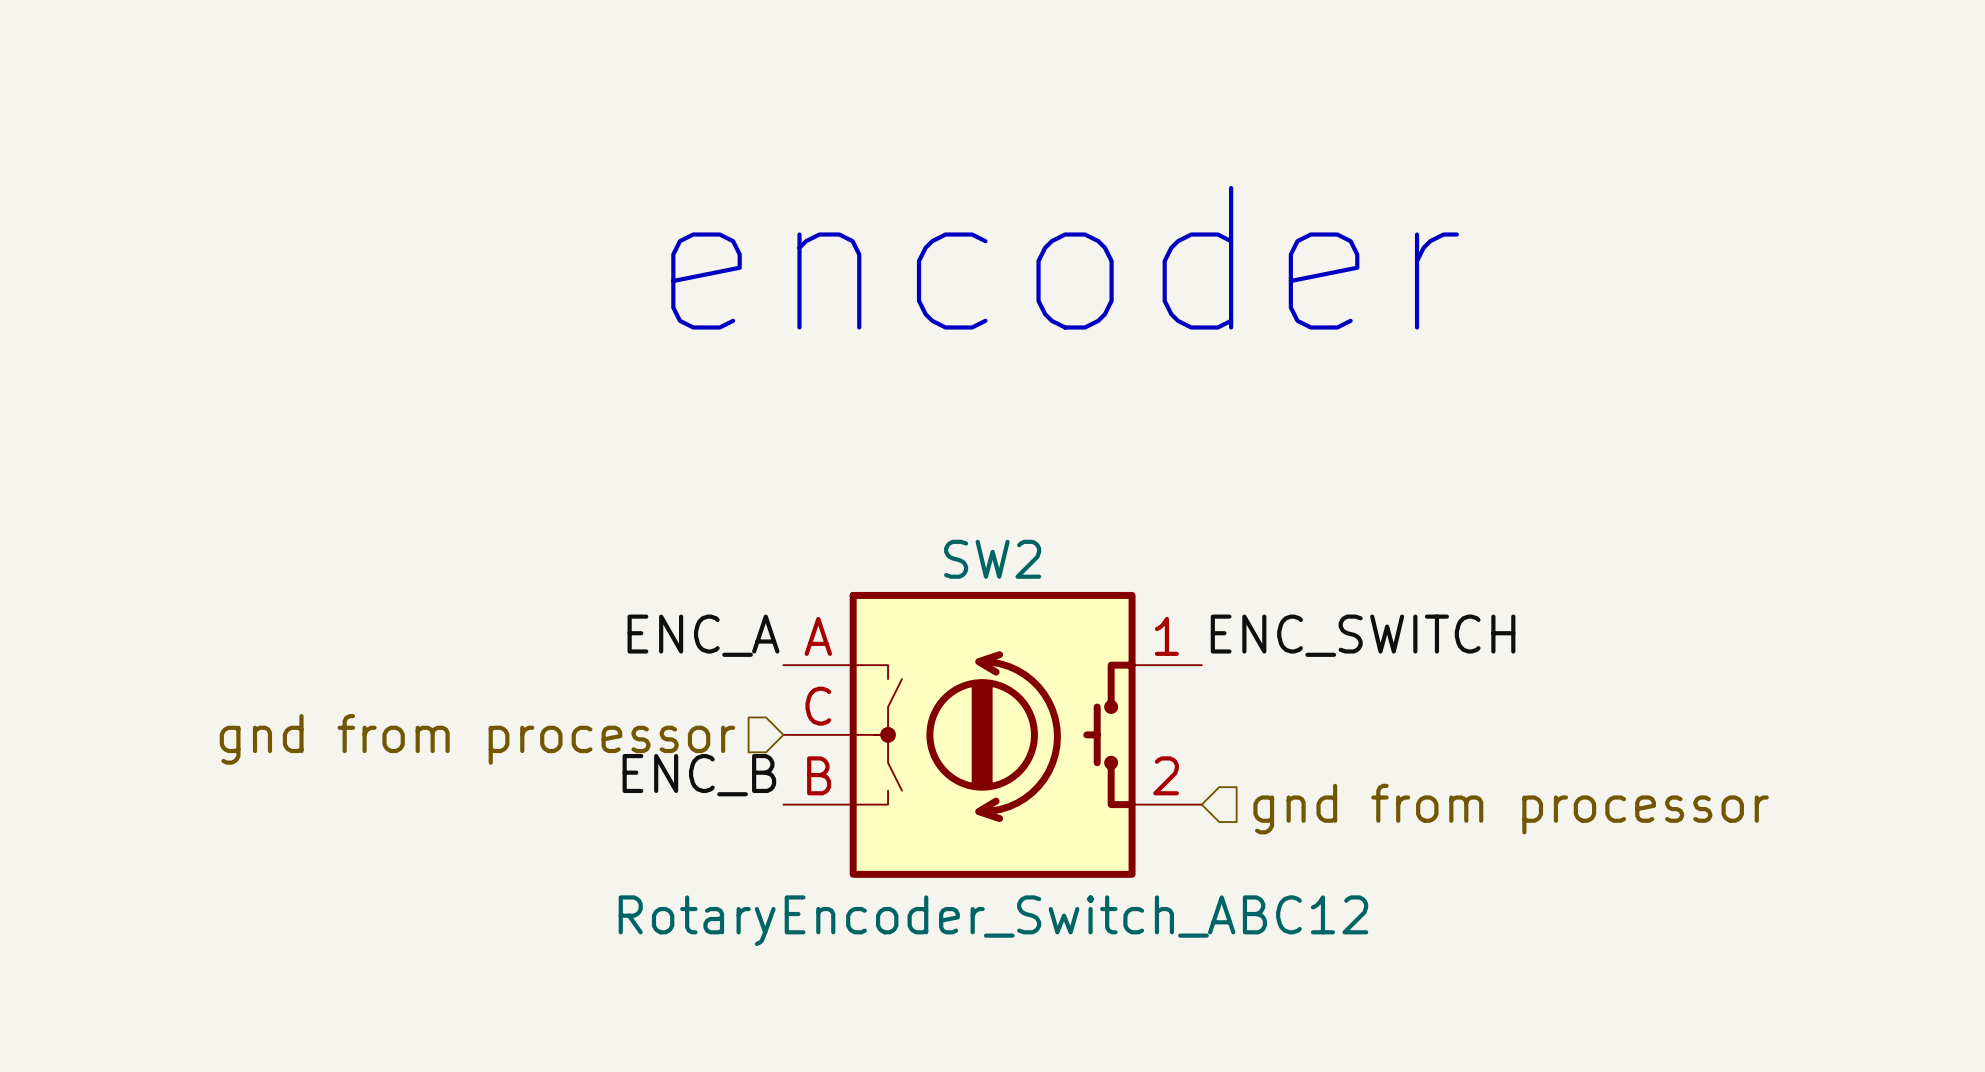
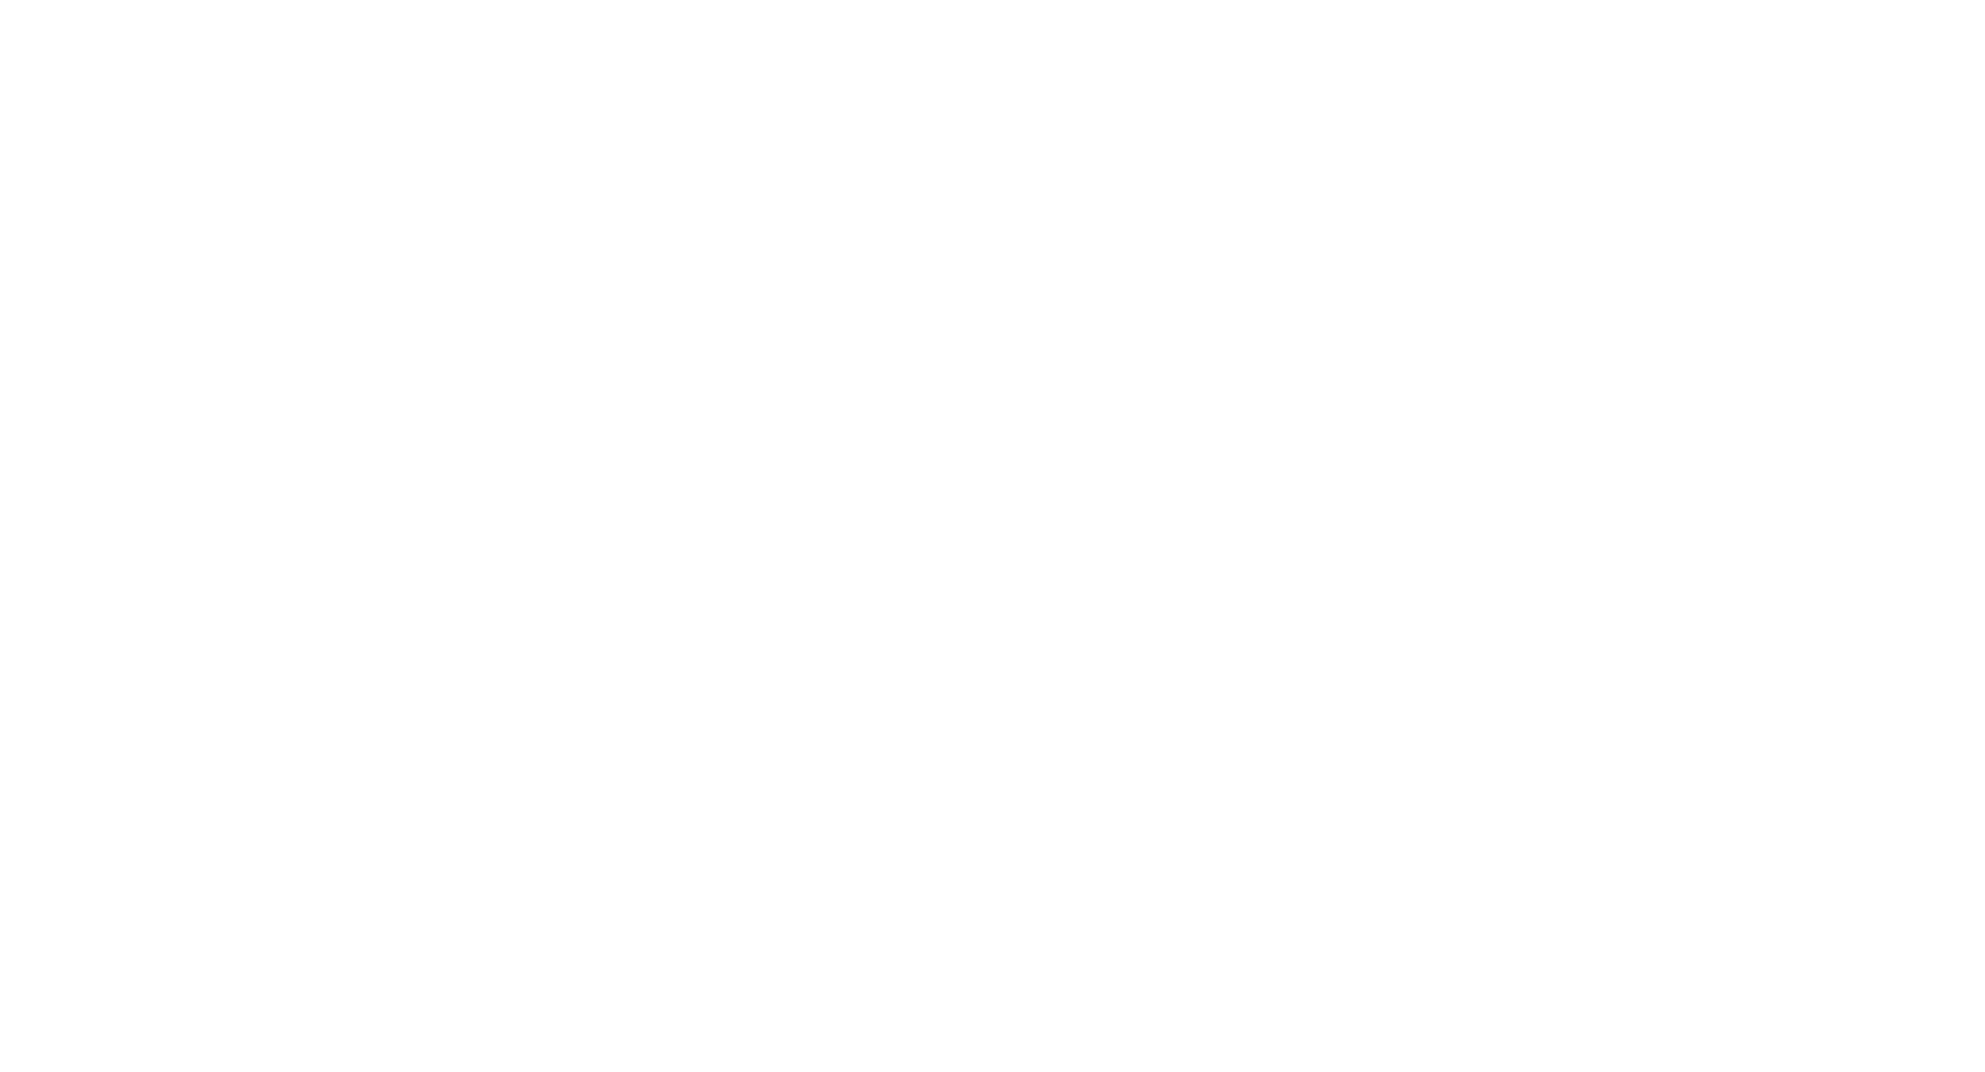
text: encoder (1065, 257) -> none
label: ENC_A (703, 635) -> none
label: ENC_SWITCH (1363, 635) -> none
SW2: RotaryEncoder_Switch_ABC12 (992, 734) -> none
hierarchical label: gnd from processor (477, 739) -> none
label: ENC_B (699, 775) -> none
hierarchical label: gnd from processor (1511, 809) -> none

